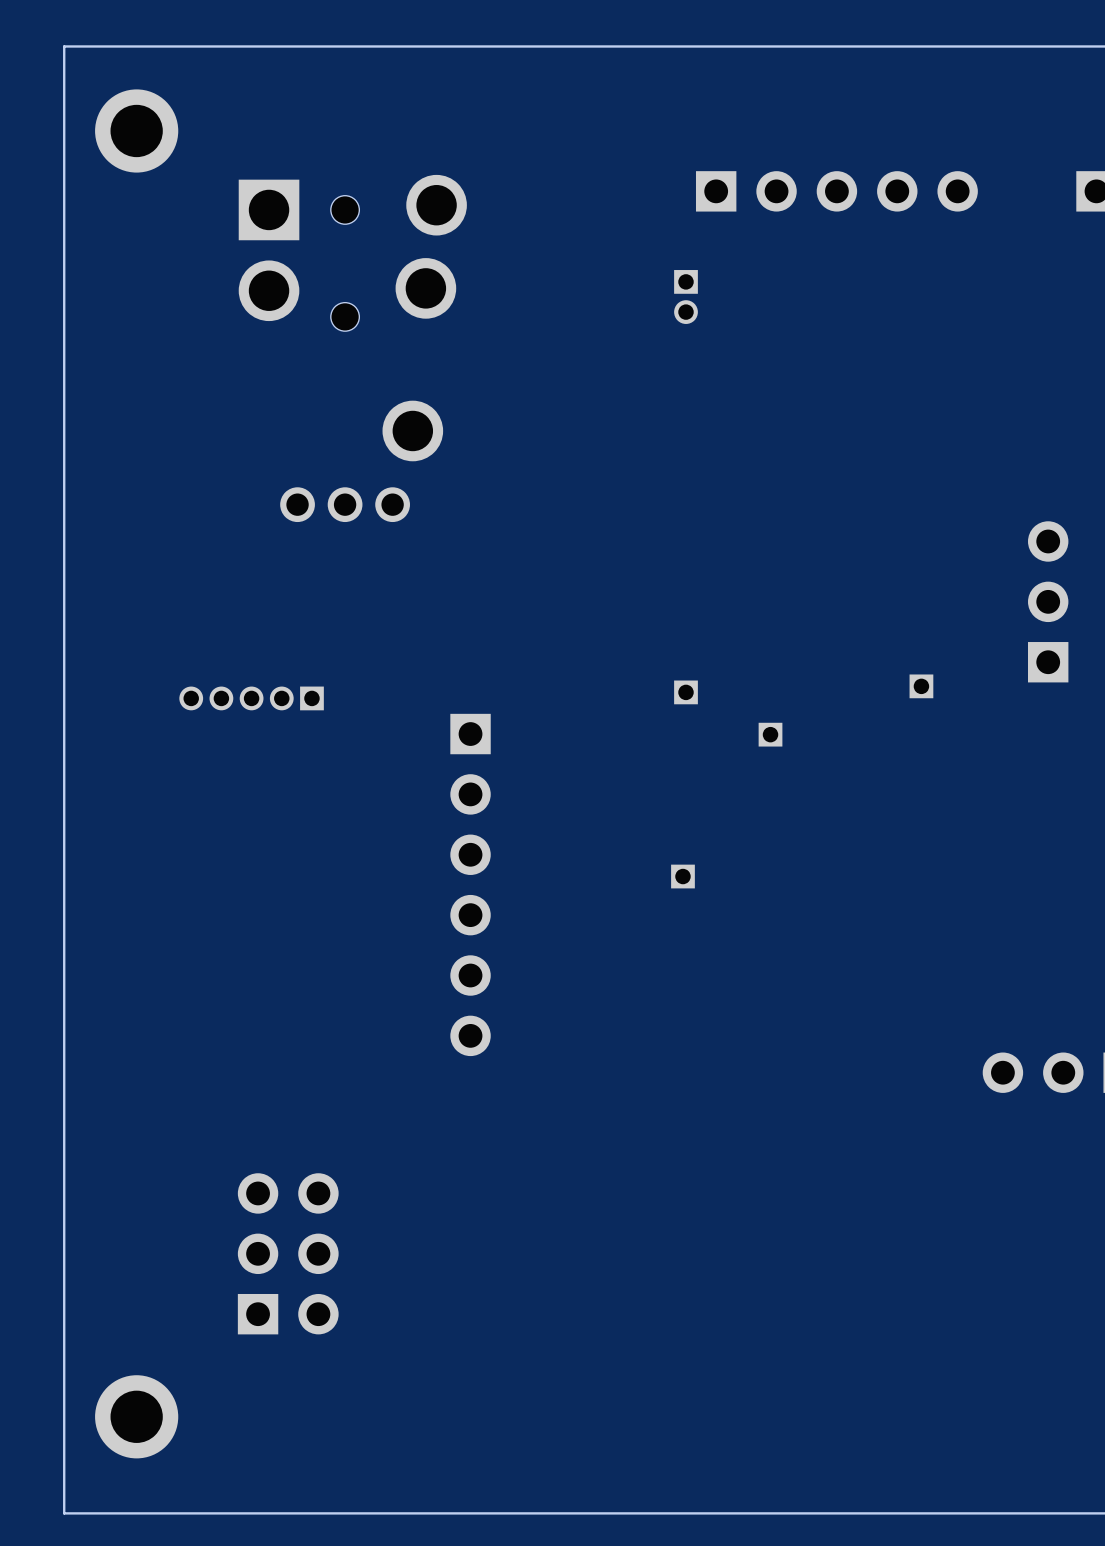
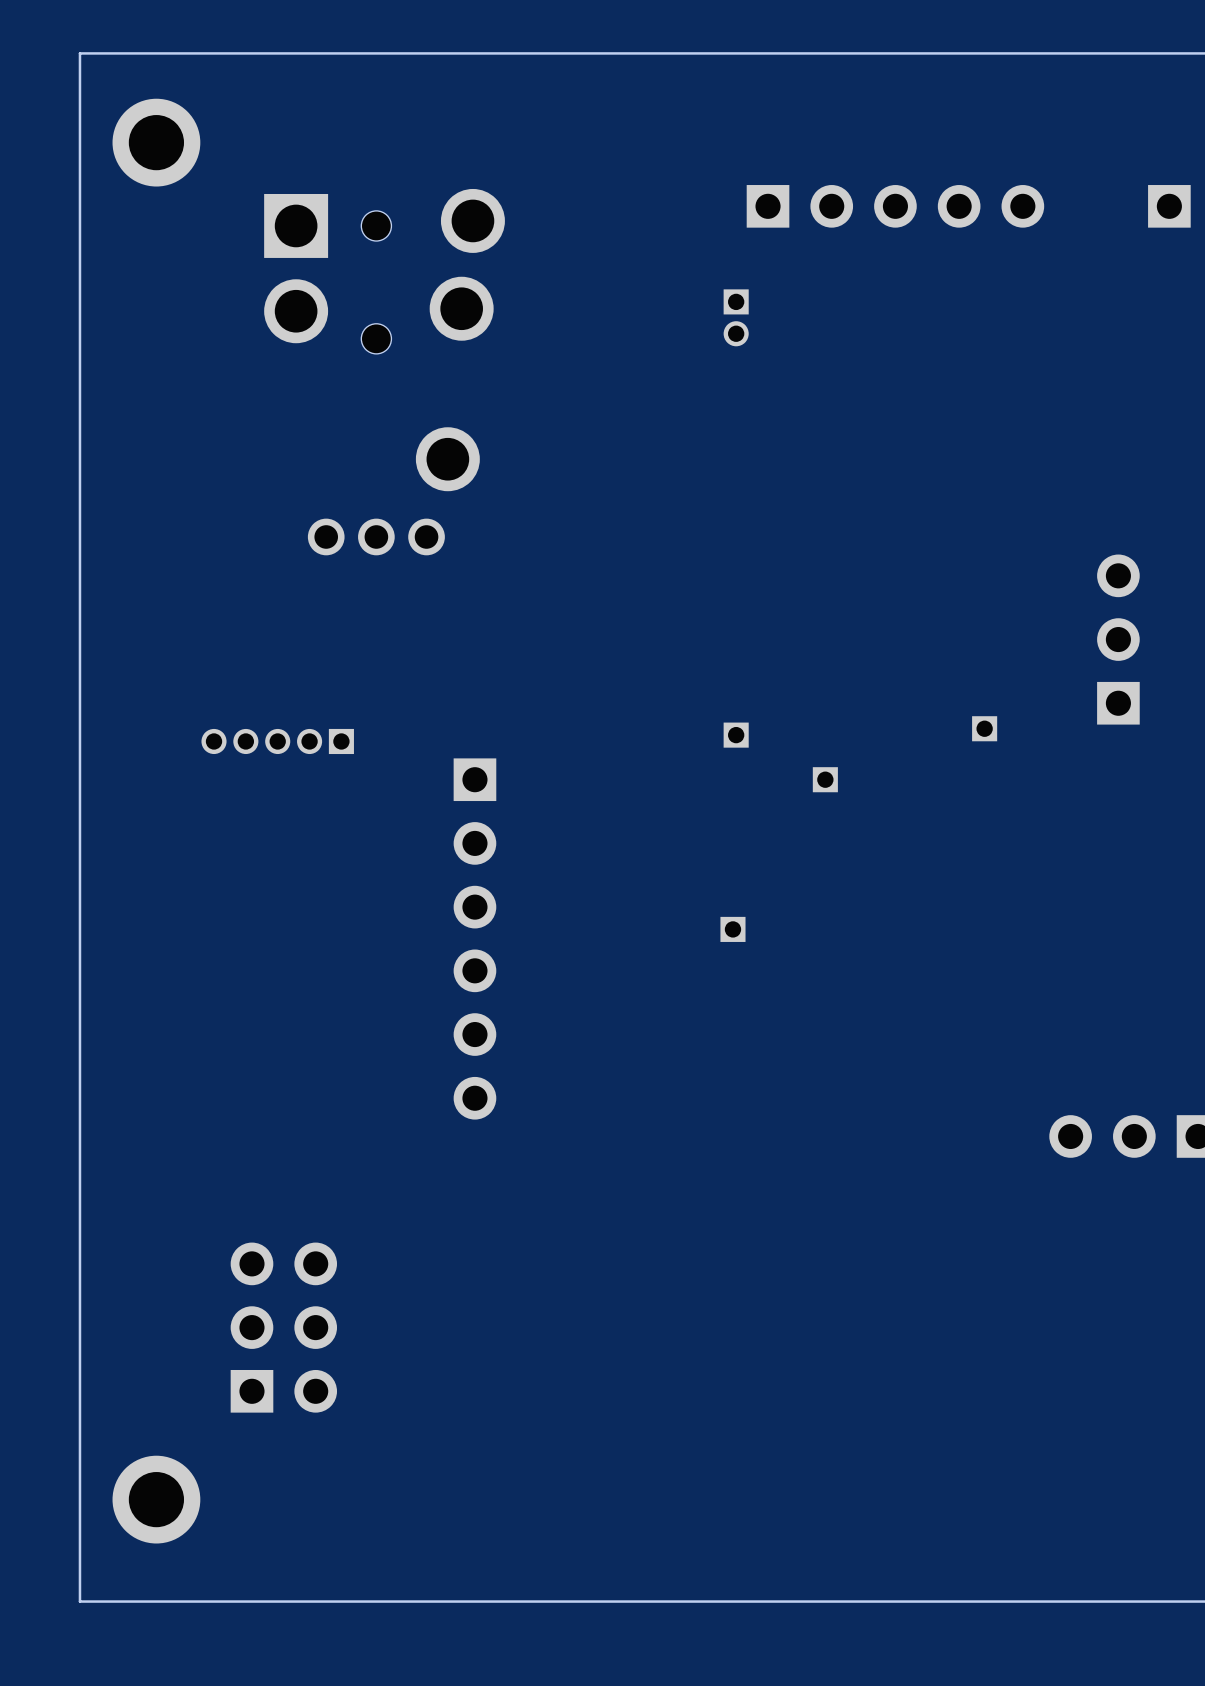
part position: (470, 884) -> (474, 938)
part position: (288, 1253) -> (283, 1327)

